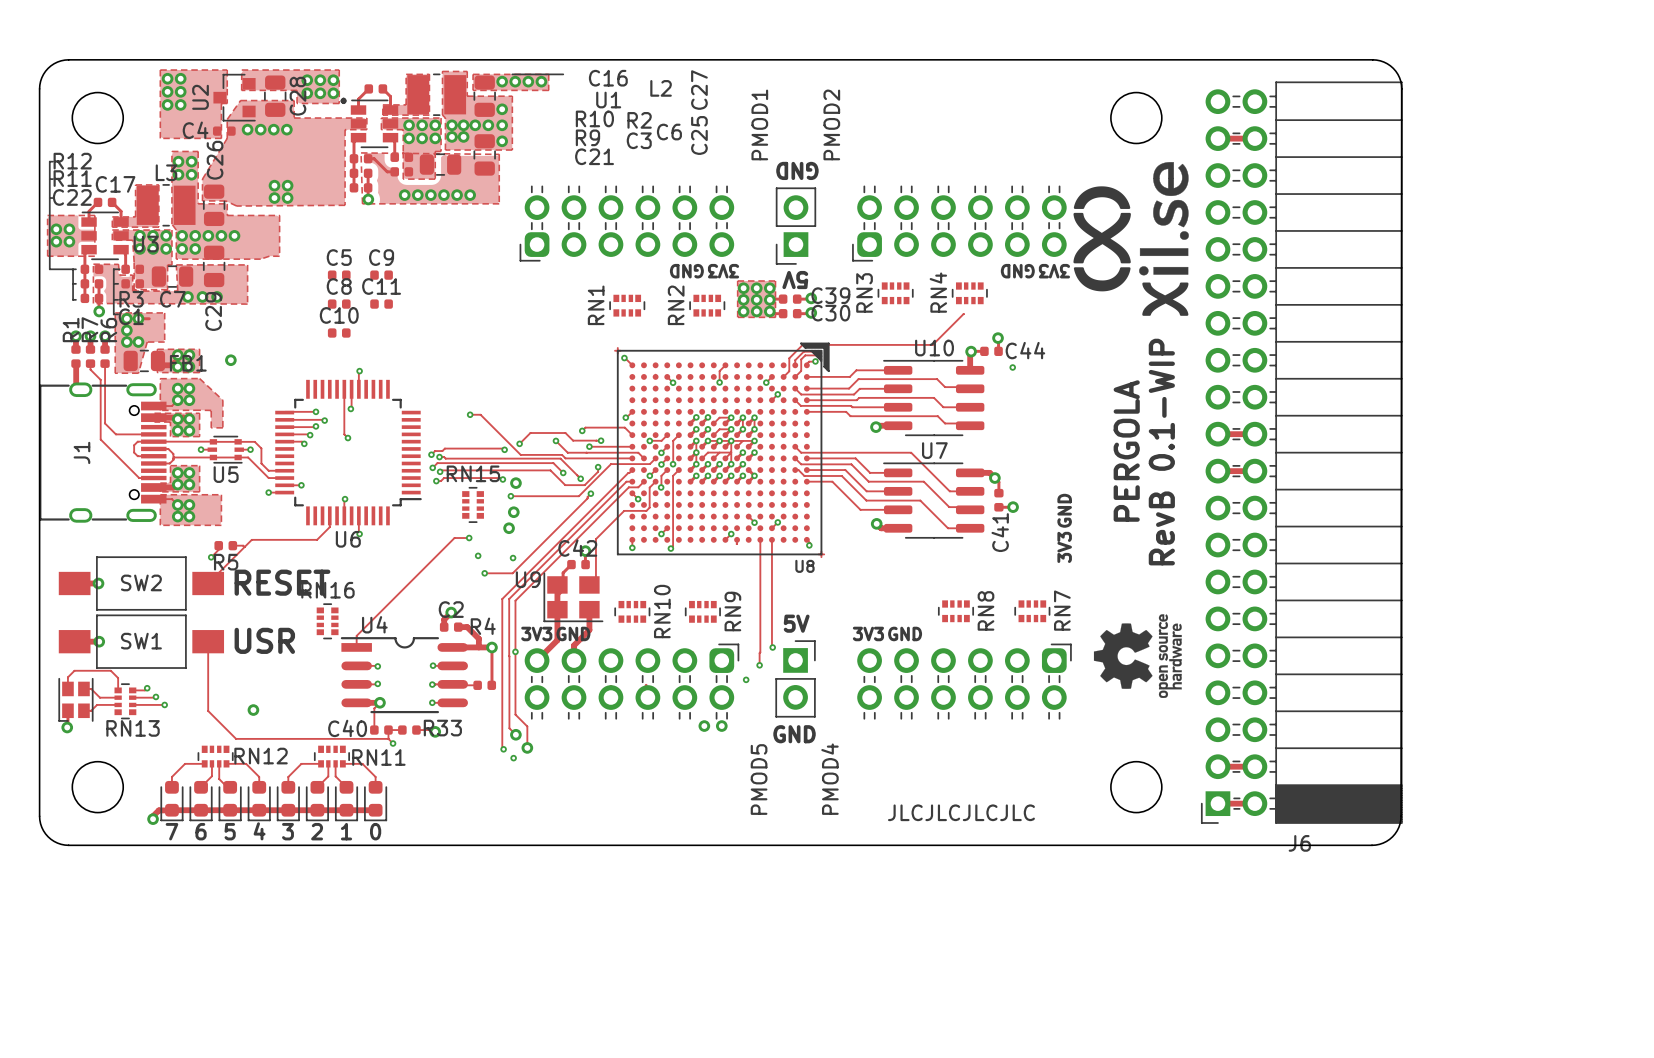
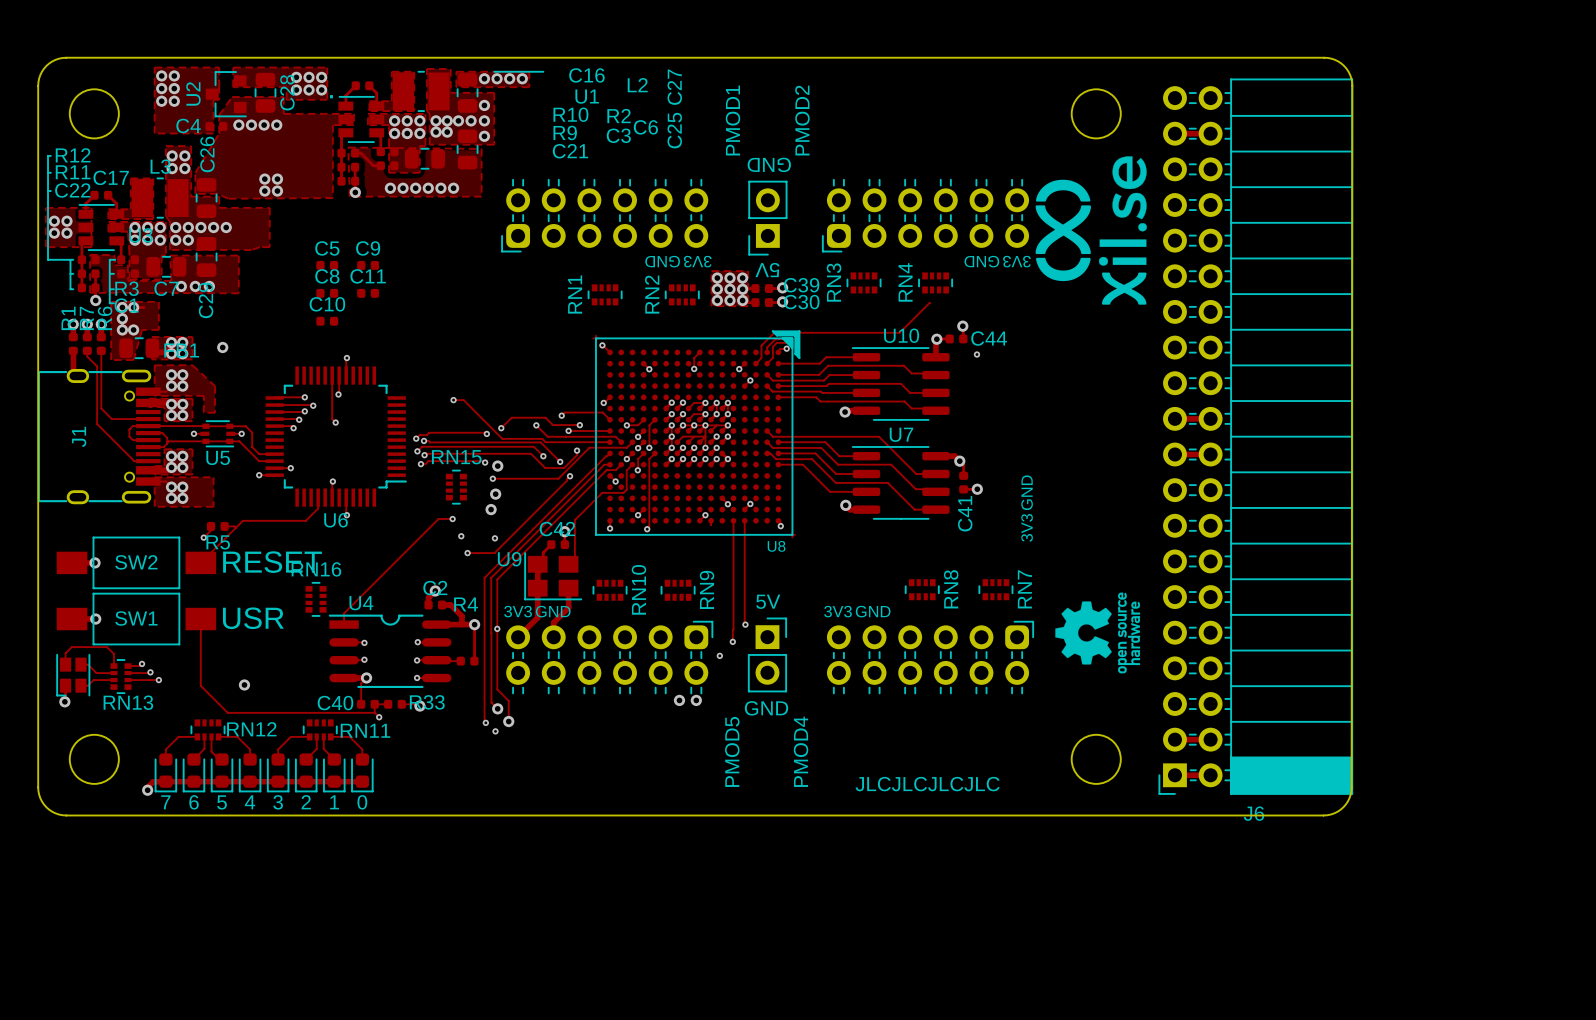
text: PERGOLA (1126, 451) -> none
text: RevB 0.1-WIP (1161, 452) -> none

